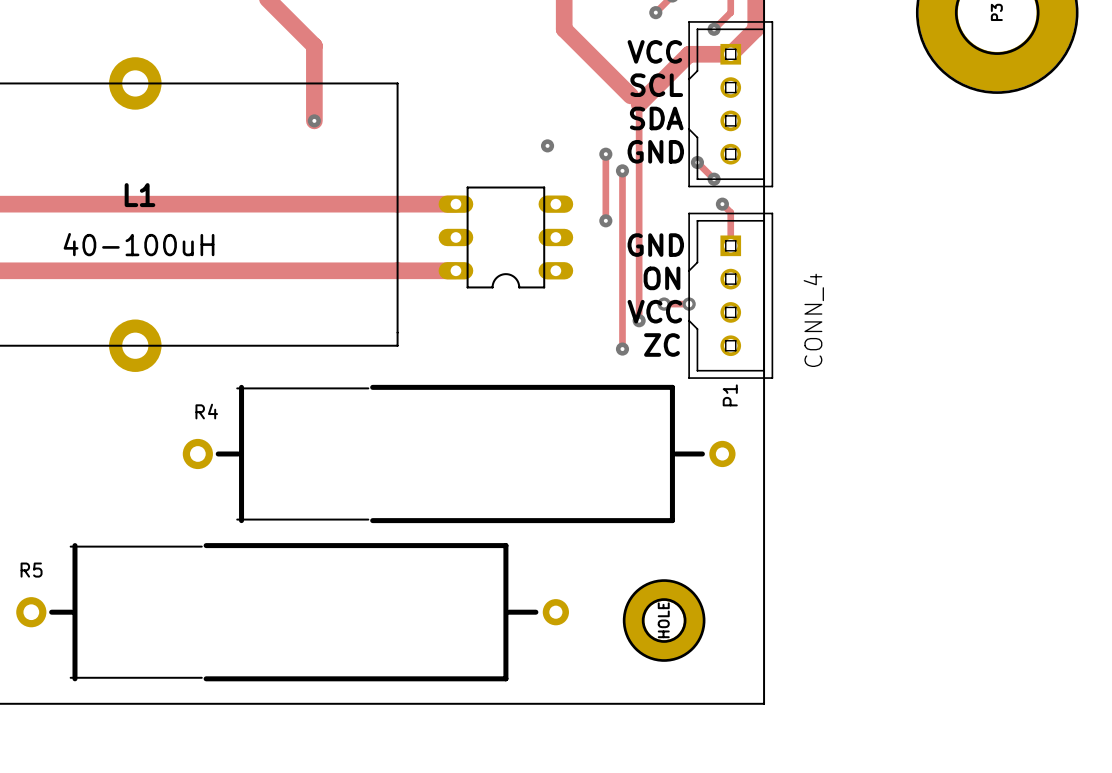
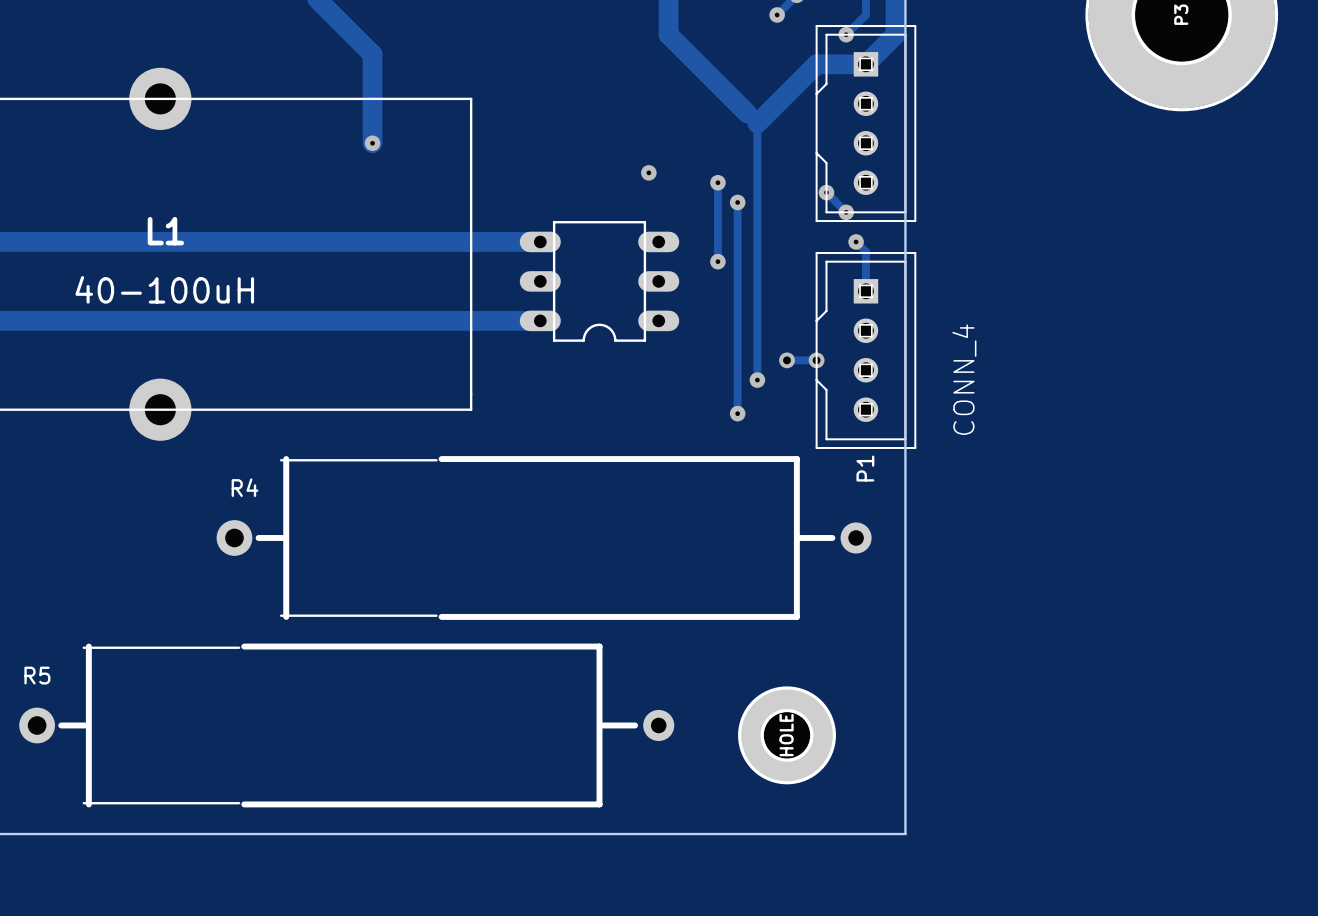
text: VCC (654, 51) -> none
text: SCL (656, 85) -> none
text: SDA (656, 118) -> none
text: GND (655, 151) -> none
text: GND (655, 245) -> none
text: ON (661, 278) -> none
text: VCC (654, 311) -> none
text: ZC (661, 344) -> none

